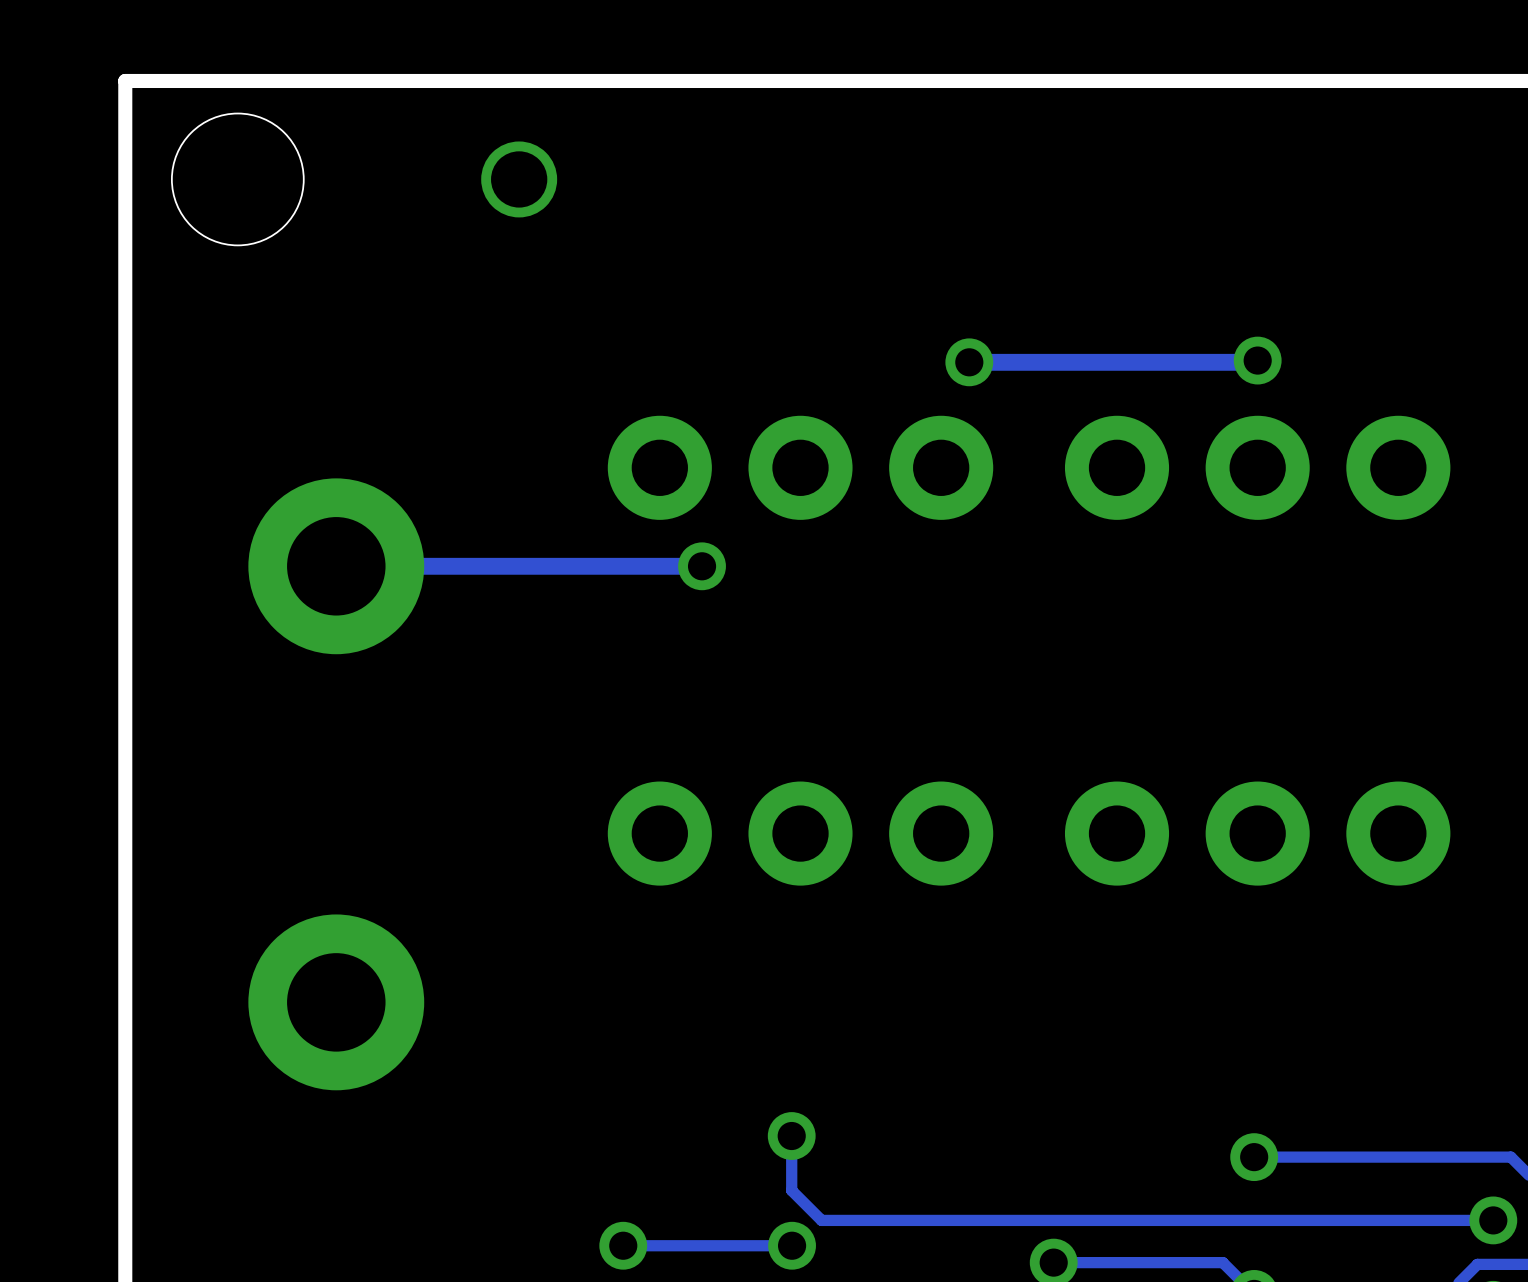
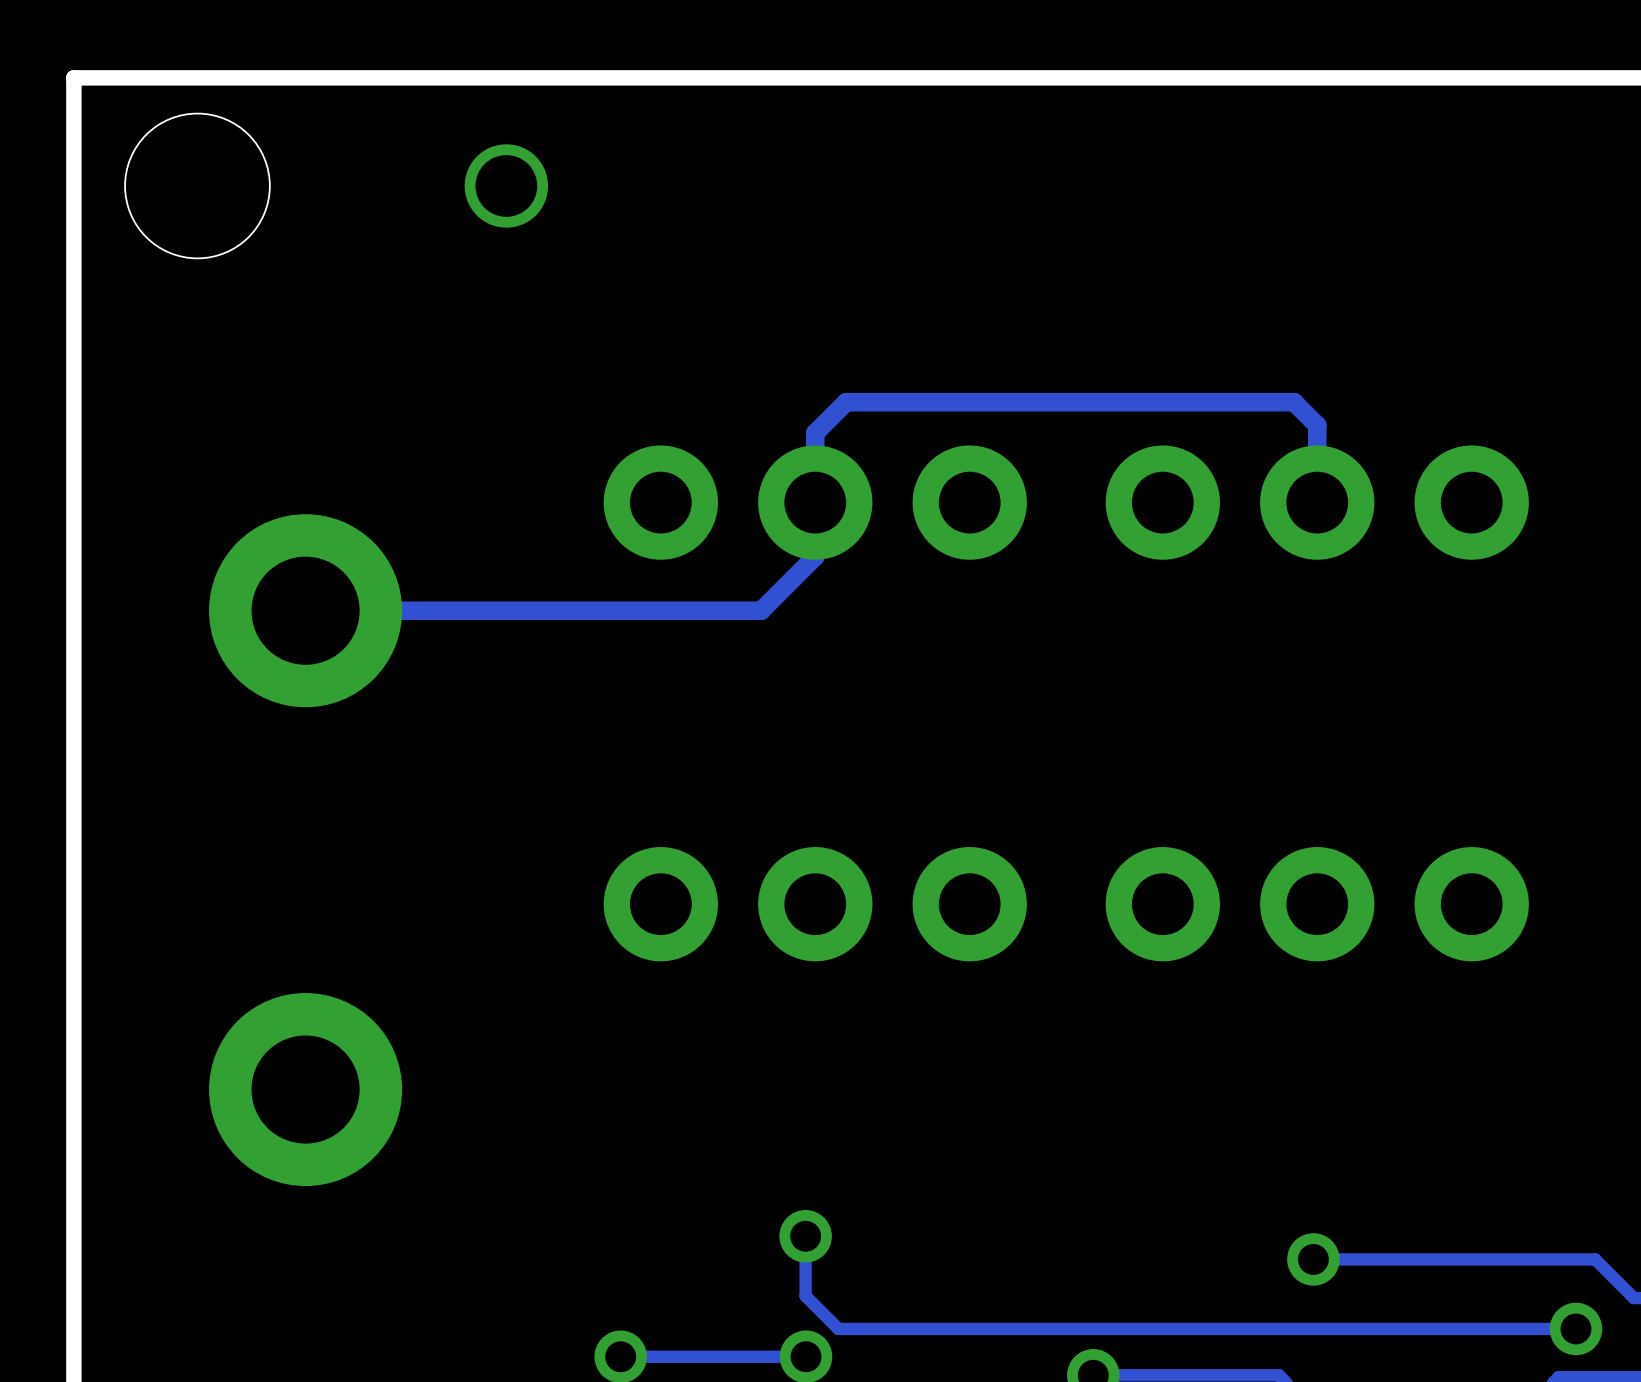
track: (1257, 360) (1255, 362) (969, 362) -> none
via: (1257, 360) -> none
via: (969, 362) -> none
track: none -> (1317, 502) (1317, 425) (1294, 402) (846, 402) (815, 433) (815, 556) (761, 610) (707, 610)
via: (702, 566) -> none

